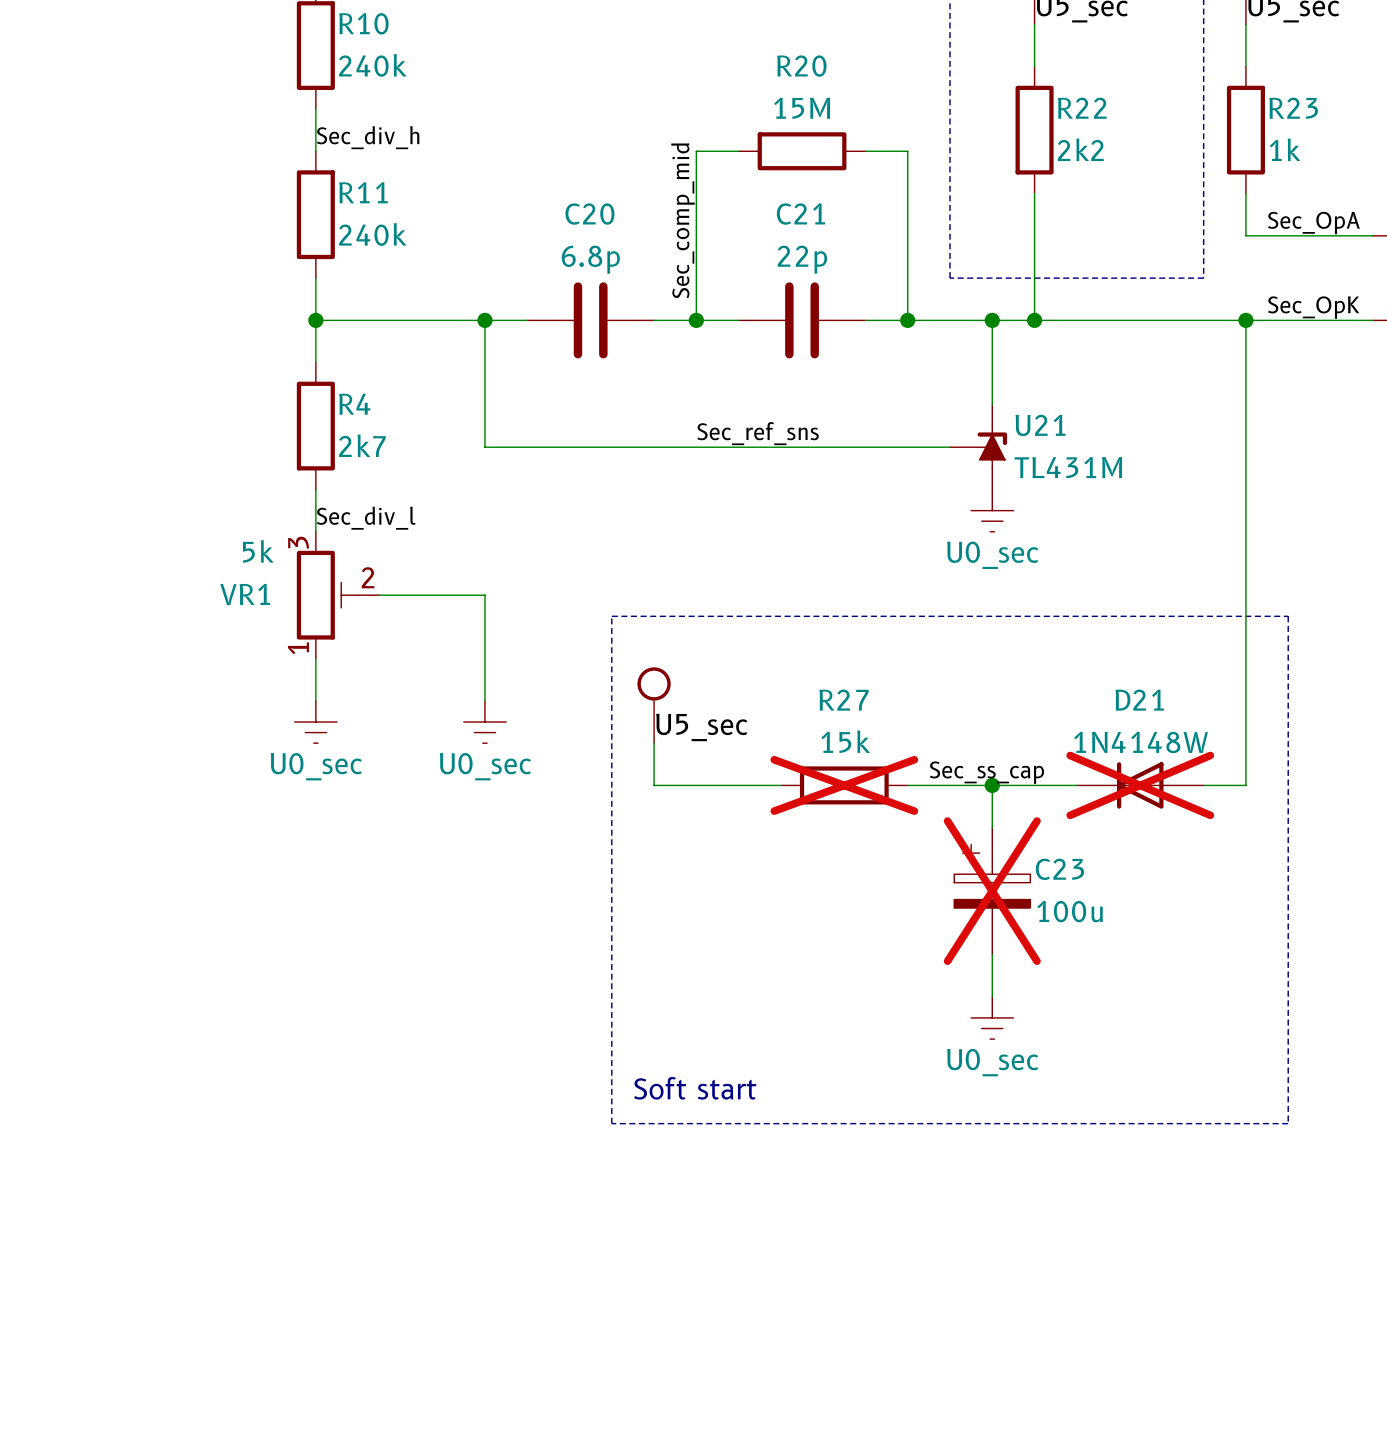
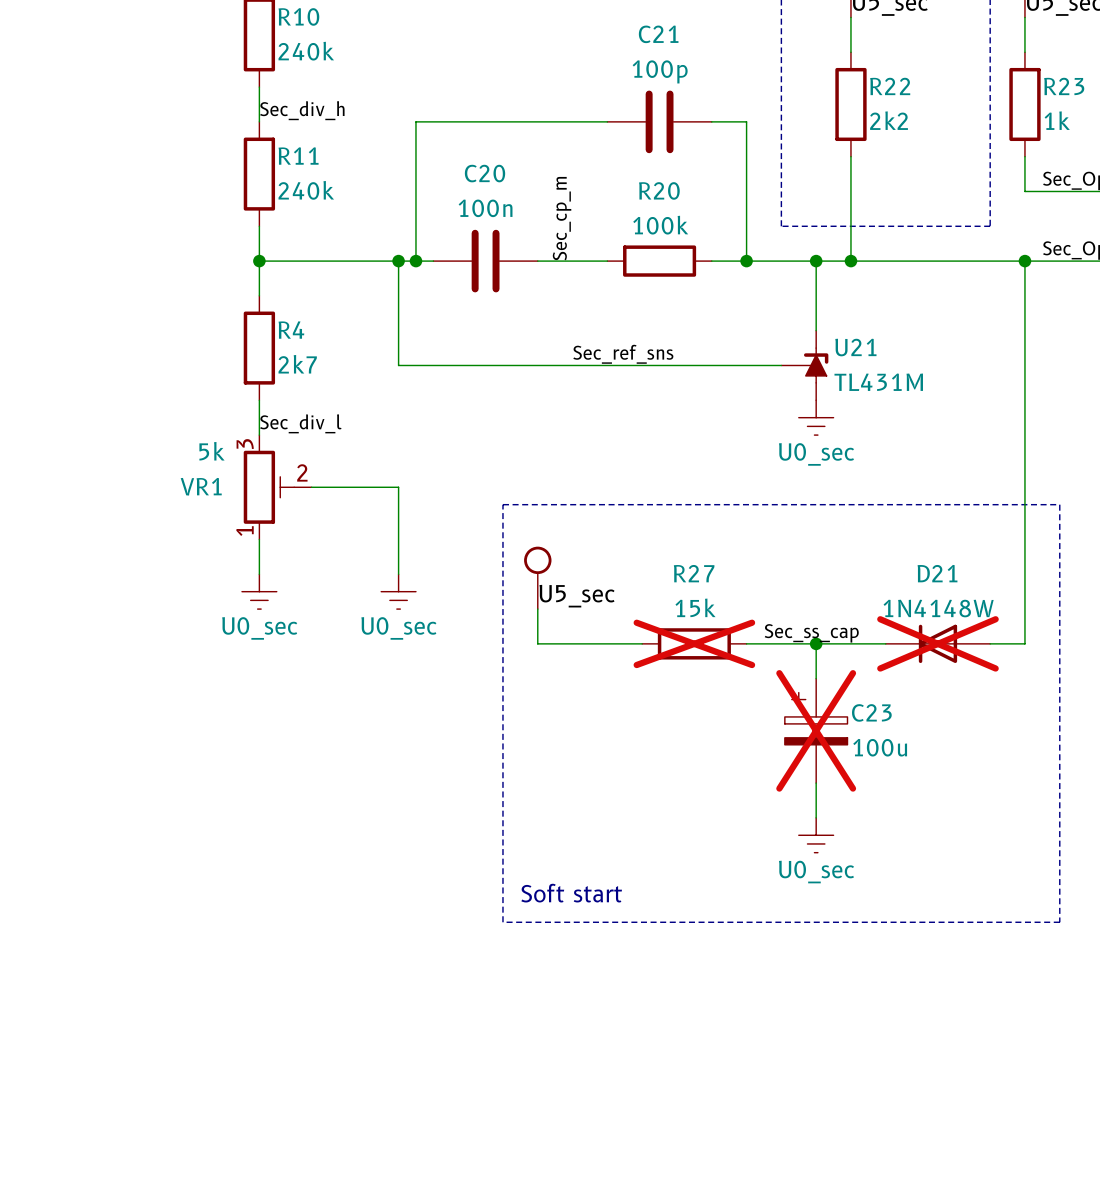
R20 value: 15M (802, 108) -> 100k (660, 225)
wire: (696, 151) (696, 320) -> (572, 121) (415, 121) (415, 261)
R20 position: (802, 151) -> (659, 261)
label: Sec_comp_mid (682, 220) -> Sec_cp_m (562, 218)
C20 value: 6.8p (590, 259) -> 100n (485, 208)
C21 value: 22p (802, 259) -> 100p (660, 71)
junction: none -> (415, 261)
junction: (696, 320) -> none
C21 position: (802, 320) -> (659, 121)

